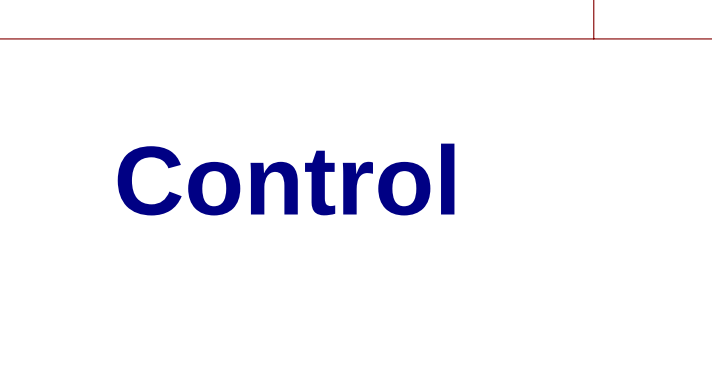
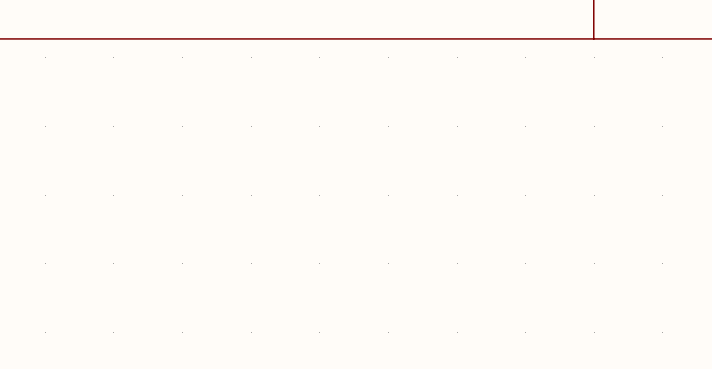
text: Control (286, 179) -> none

